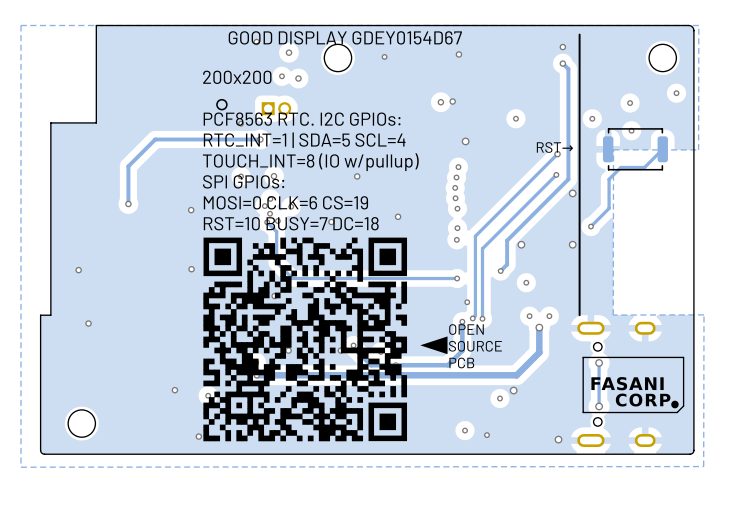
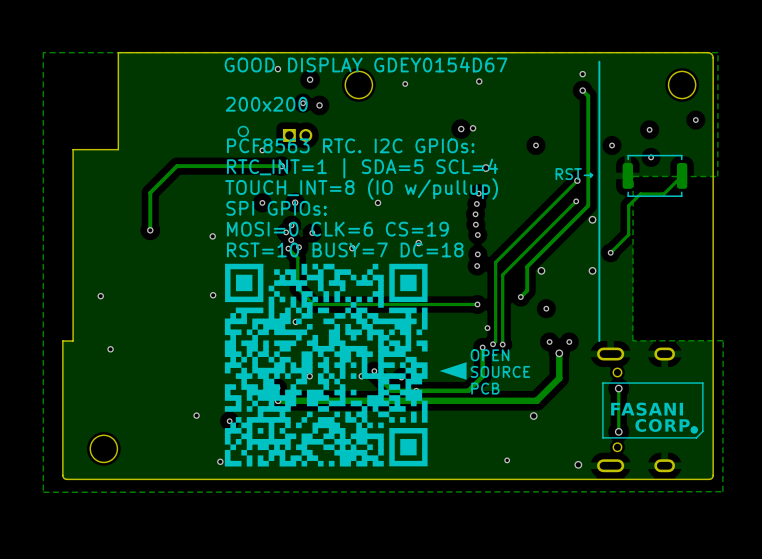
via: (499, 398) -> none
via: (465, 430) -> none

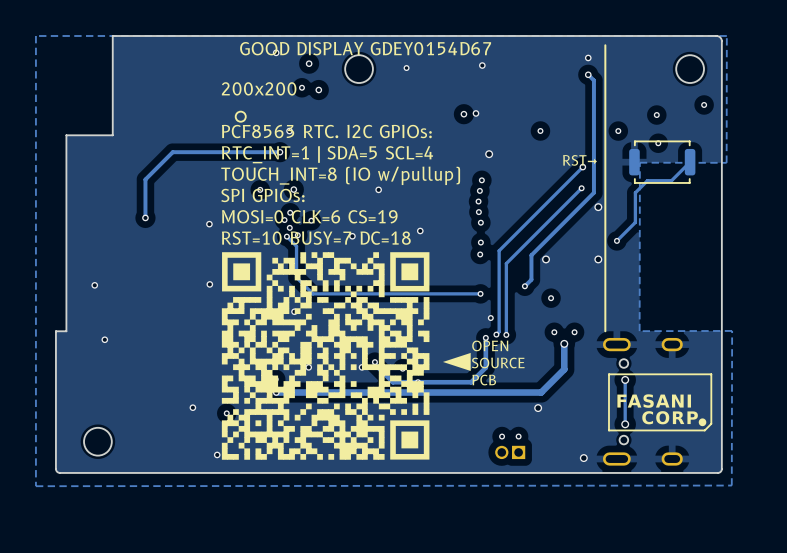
part: (297, 135) -> none
via: none -> (289, 131)
via: (262, 150) -> none
via: none -> (502, 436)
via: none -> (518, 436)
part: none -> (510, 452)
via: (507, 460) -> none

